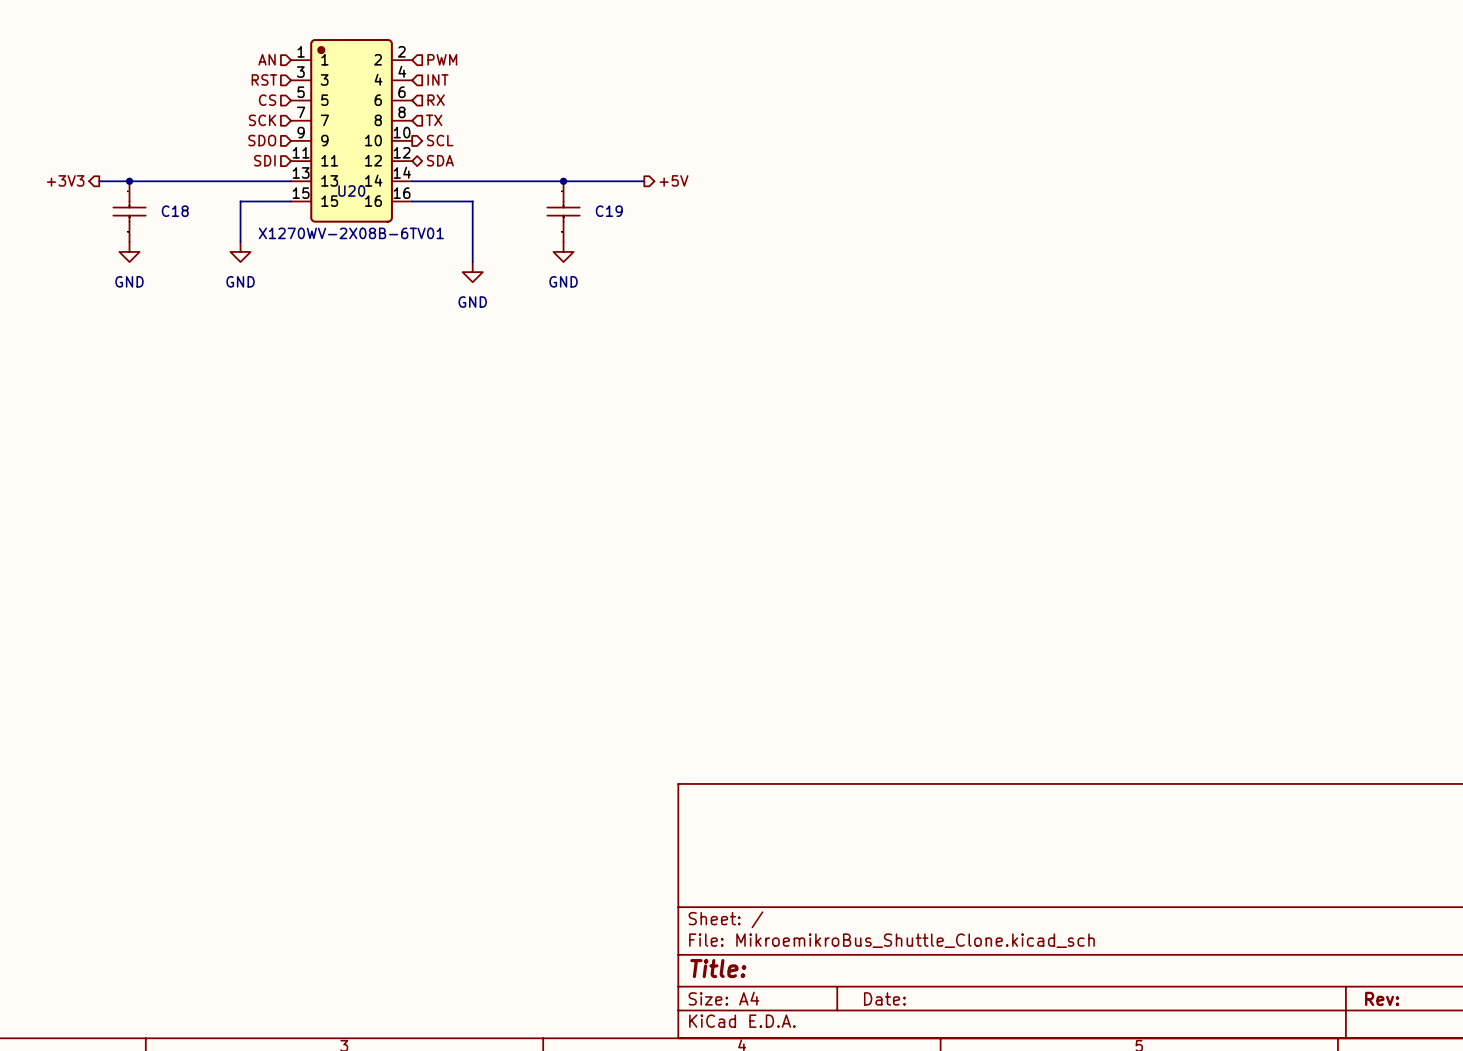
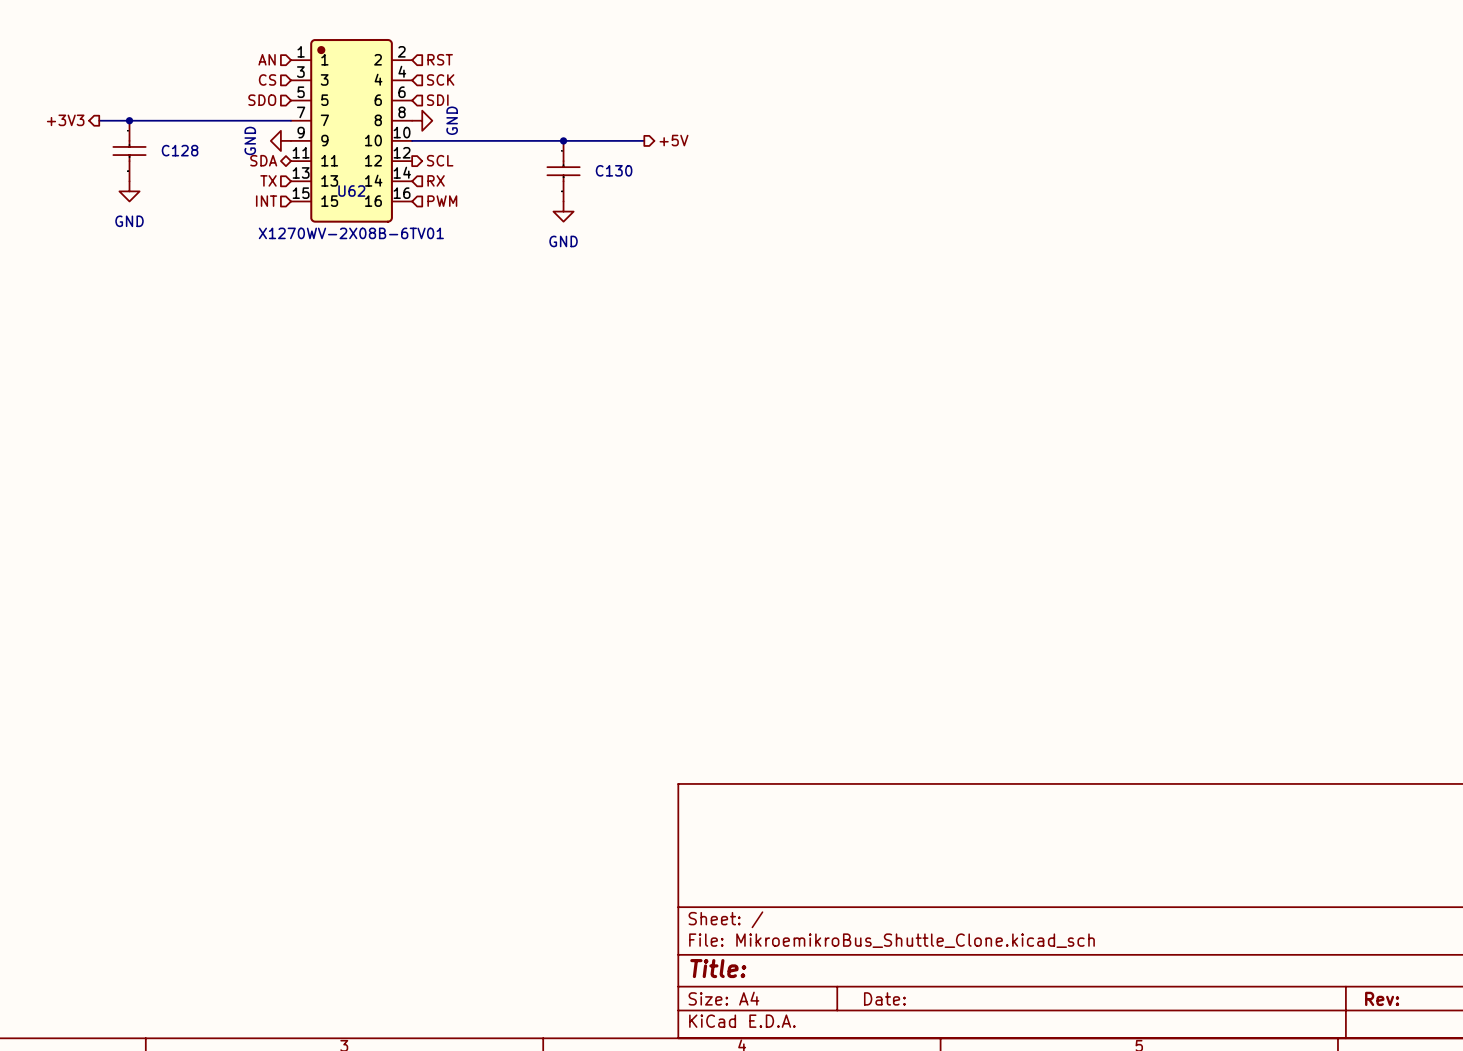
hierarchical label: PWM (442, 59) -> RST (440, 59)
hierarchical label: RST (264, 79) -> CS (267, 79)
hierarchical label: INT (438, 79) -> SCK (440, 79)
hierarchical label: CS (267, 100) -> SDO (262, 100)
hierarchical label: RX (436, 100) -> SDI (437, 100)
junction: none -> (129, 120)
hierarchical label: SCK (262, 120) -> none
power symbol: none -> GND (422, 120)
hierarchical label rotation: 0° (434, 120) -> 180° (268, 180)
hierarchical label position: TX (434, 120) -> TX (268, 180)
hierarchical label: SDO (262, 140) -> none
power symbol: none -> GND (280, 140)
hierarchical label: SCL (440, 140) -> none
C128: none -> (129, 151)
hierarchical label shape: input (264, 160) -> bidirectional (263, 160)
hierarchical label: SDI (264, 160) -> SDA (263, 160)
hierarchical label shape: bidirectional (440, 160) -> output (440, 160)
hierarchical label: SDA (440, 160) -> SCL (440, 160)
C130: none -> (563, 171)
hierarchical label position: +3V3 (65, 180) -> +3V3 (65, 120)
hierarchical label: none -> RX (436, 180)
hierarchical label position: +5V (674, 180) -> +5V (674, 140)
wire: (99, 181) (291, 181) -> (99, 120) (291, 120)
junction: (129, 181) -> none
wire: (412, 181) (644, 181) -> (412, 140) (644, 140)
junction position: (563, 181) -> (563, 140)
U20 name: U20 (351, 191) -> U62 (351, 191)
hierarchical label: none -> INT (266, 201)
wire: (291, 201) (240, 201) (240, 241) -> none
wire: (412, 201) (472, 201) (472, 262) -> none
hierarchical label: none -> PWM (442, 201)
C18: (129, 211) -> none
C19: (563, 211) -> none
power symbol position: GND (129, 251) -> GND (129, 191)
power symbol: GND (240, 251) -> none
power symbol position: GND (563, 251) -> GND (563, 211)
power symbol: GND (472, 272) -> none

